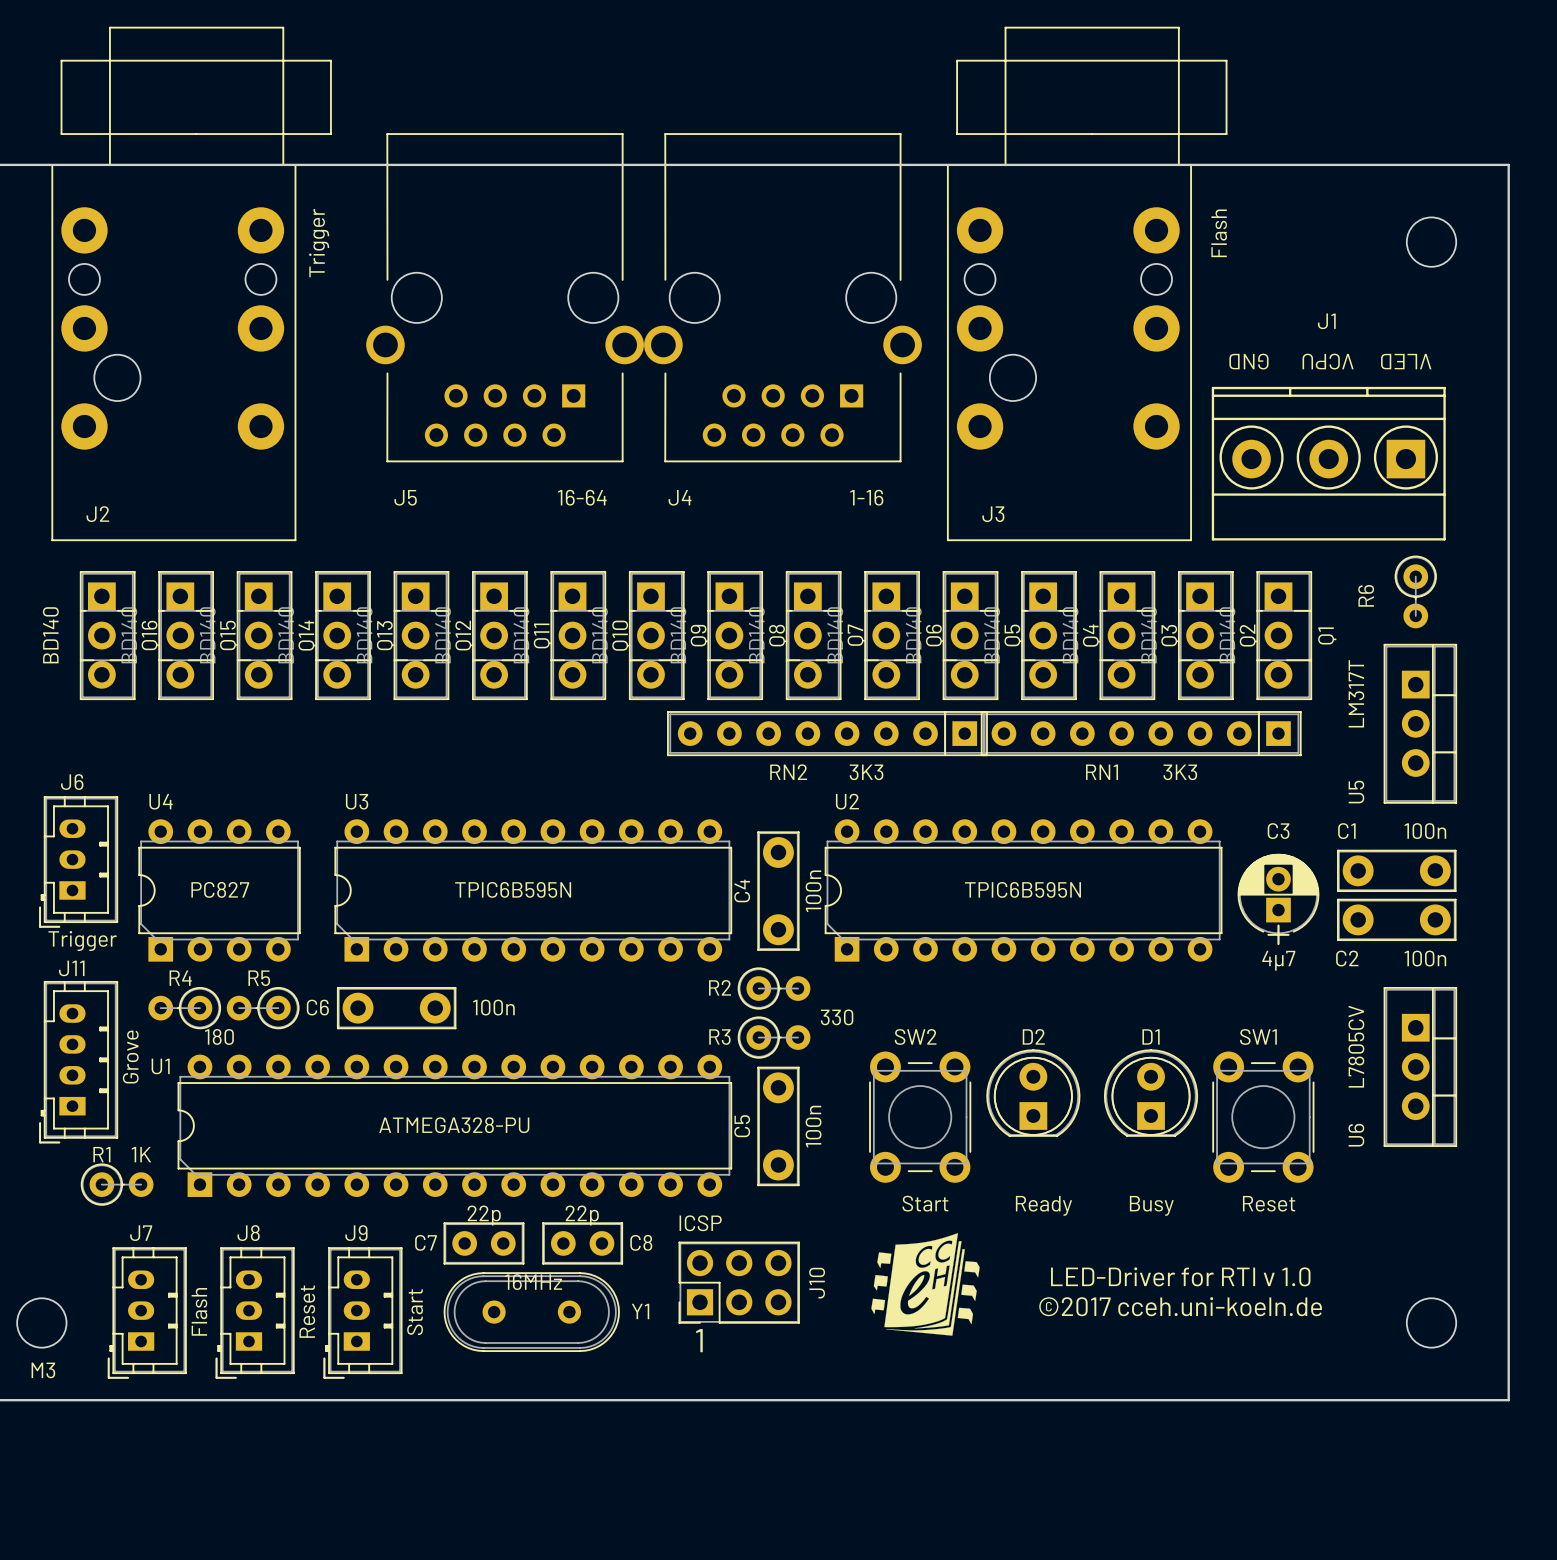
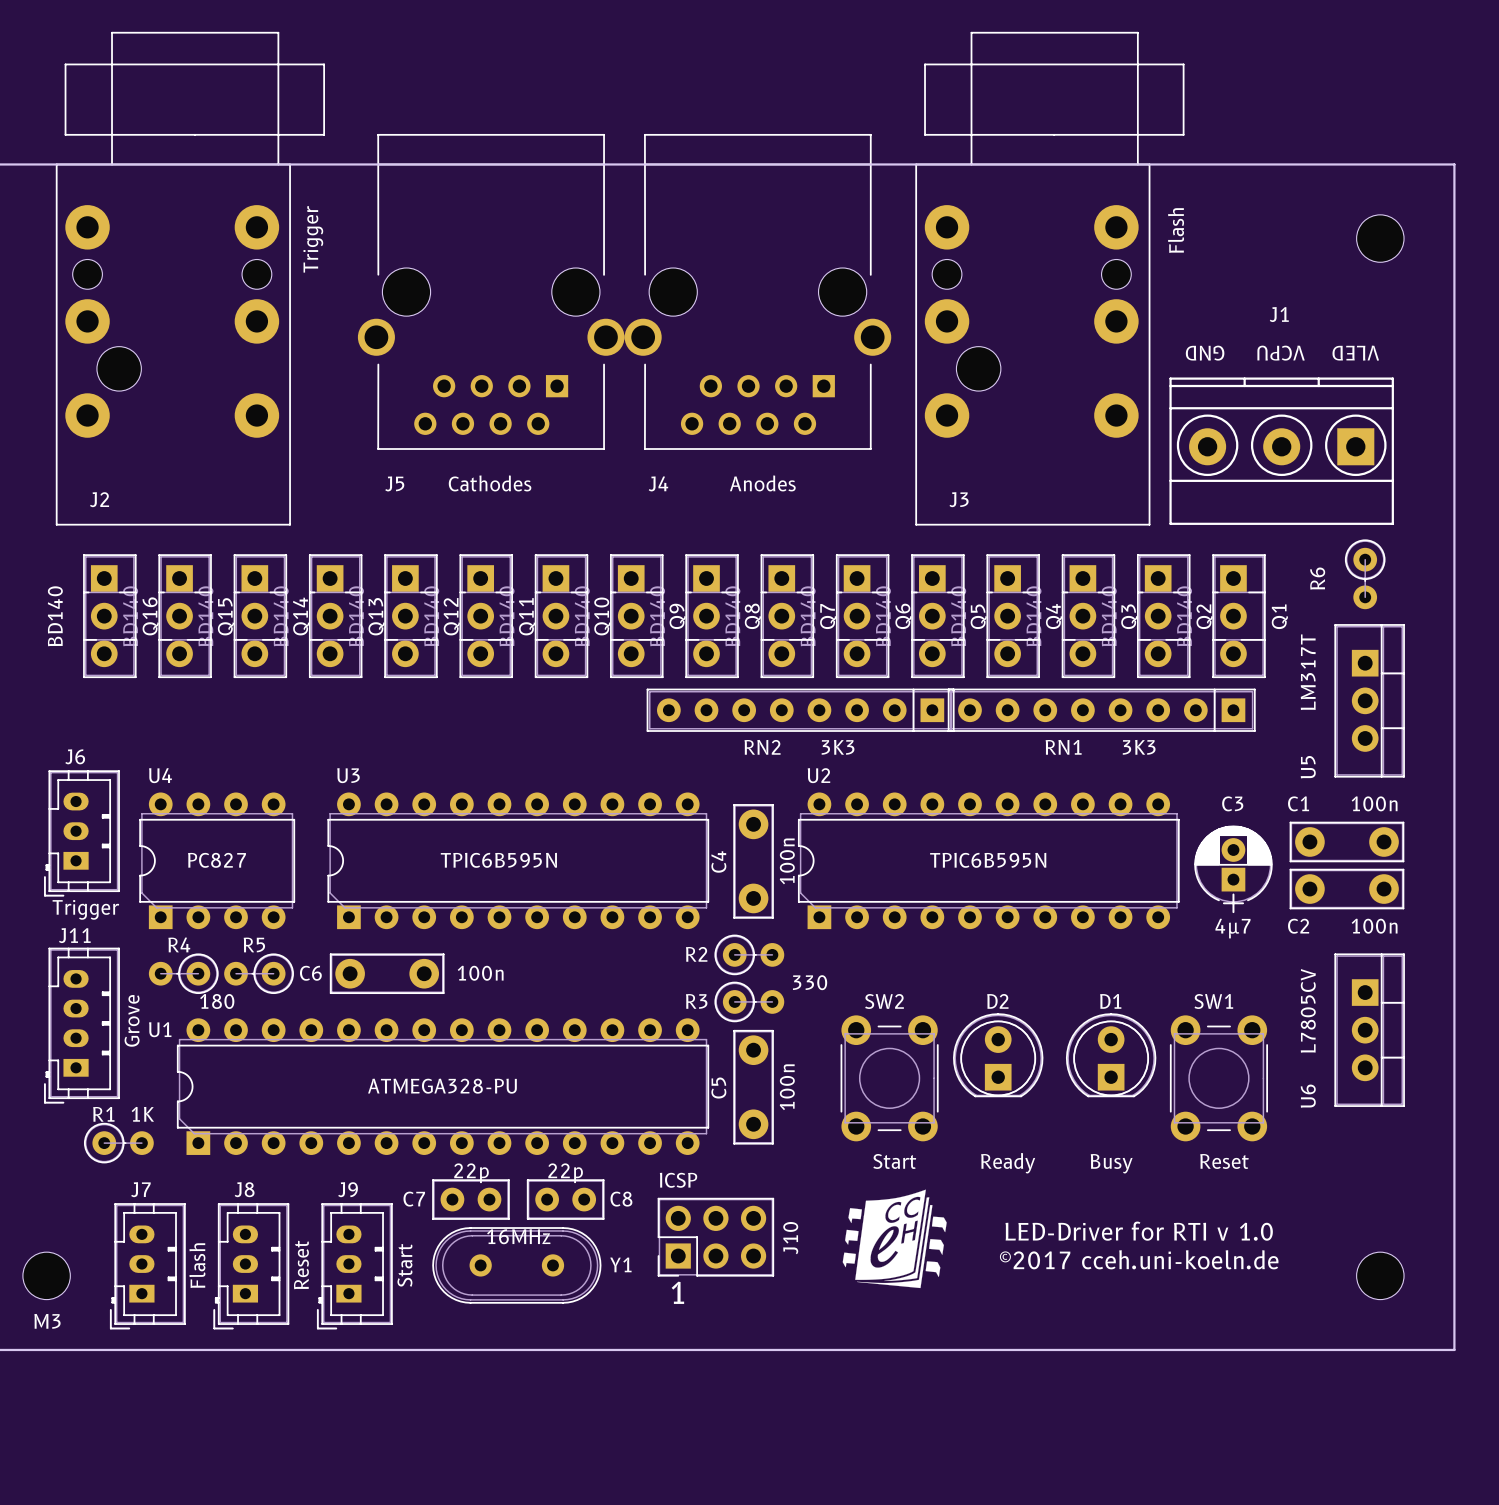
text: none -> Cathodes (490, 483)
text: 16-64 (582, 497) -> none
text: none -> Anodes (762, 483)
text: 1-16 (866, 497) -> none

